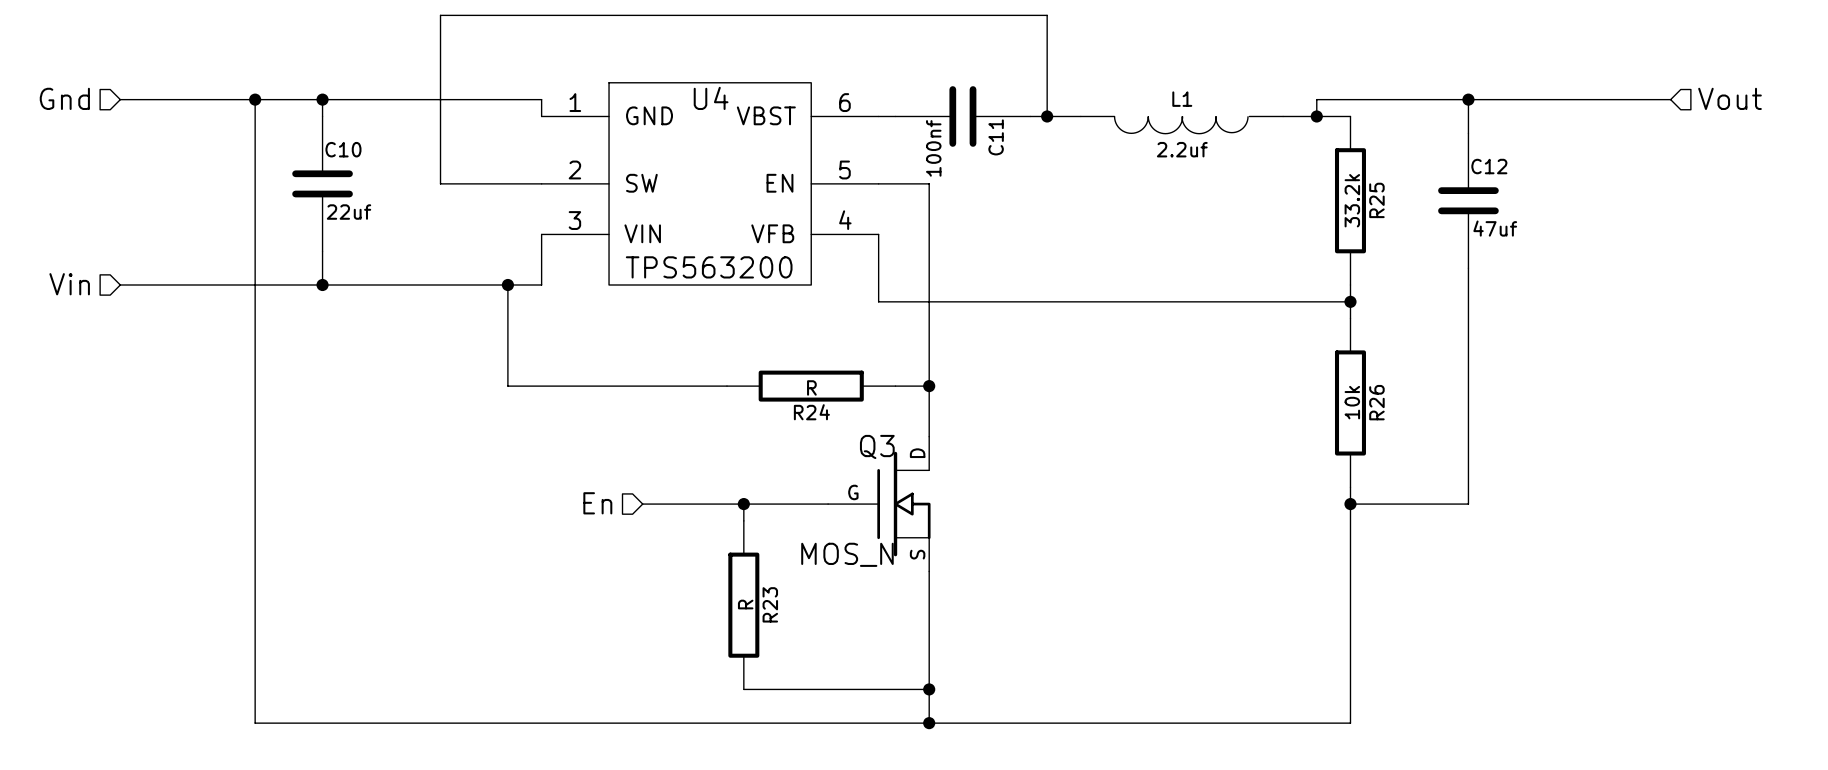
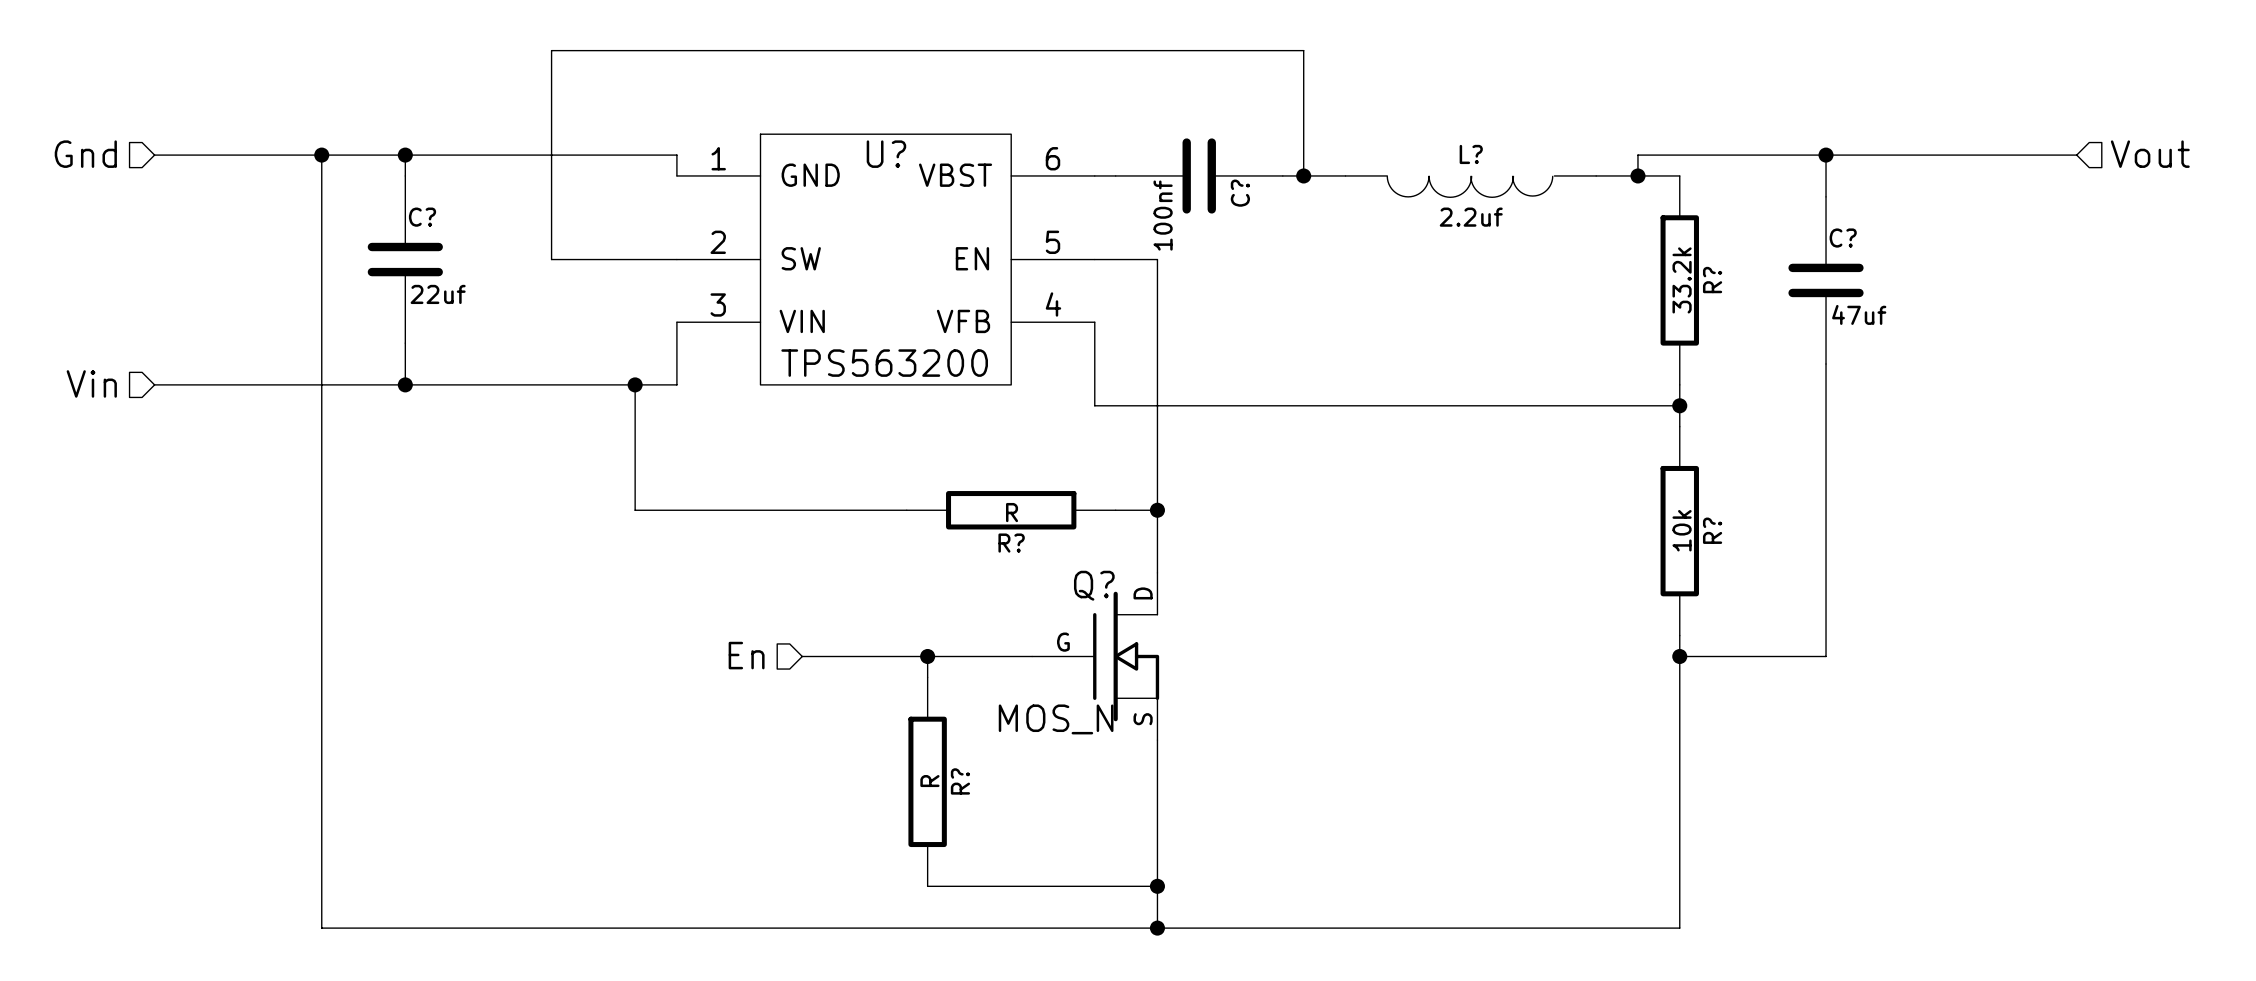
U4 name: U4 (711, 98) -> U? (886, 154)
L1 name: L1 (1182, 99) -> L? (1471, 154)
C11 name: C11 (996, 137) -> C? (1240, 193)
C10 name: C10 (343, 149) -> C? (422, 217)
C12 name: C12 (1489, 166) -> C? (1843, 238)
R25 name: R25 (1376, 200) -> R? (1712, 280)
R26 name: R26 (1376, 402) -> R? (1712, 530)
R24 name: R24 (811, 412) -> R? (1011, 543)
Q3 name: Q3 (877, 446) -> Q? (1094, 585)
R23 name: R23 (770, 604) -> R? (960, 781)

